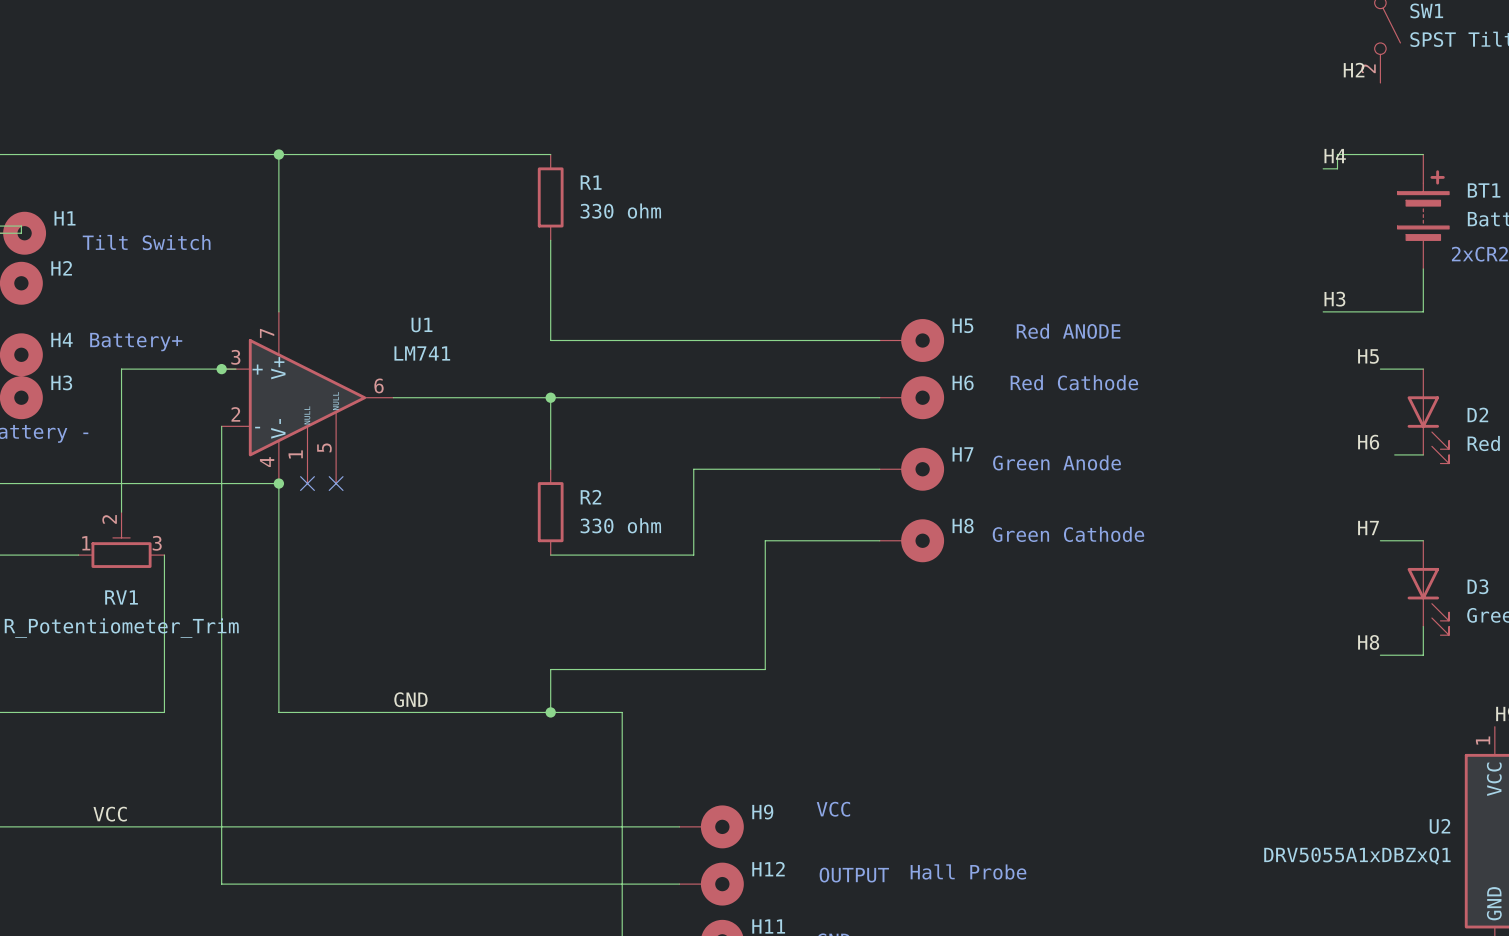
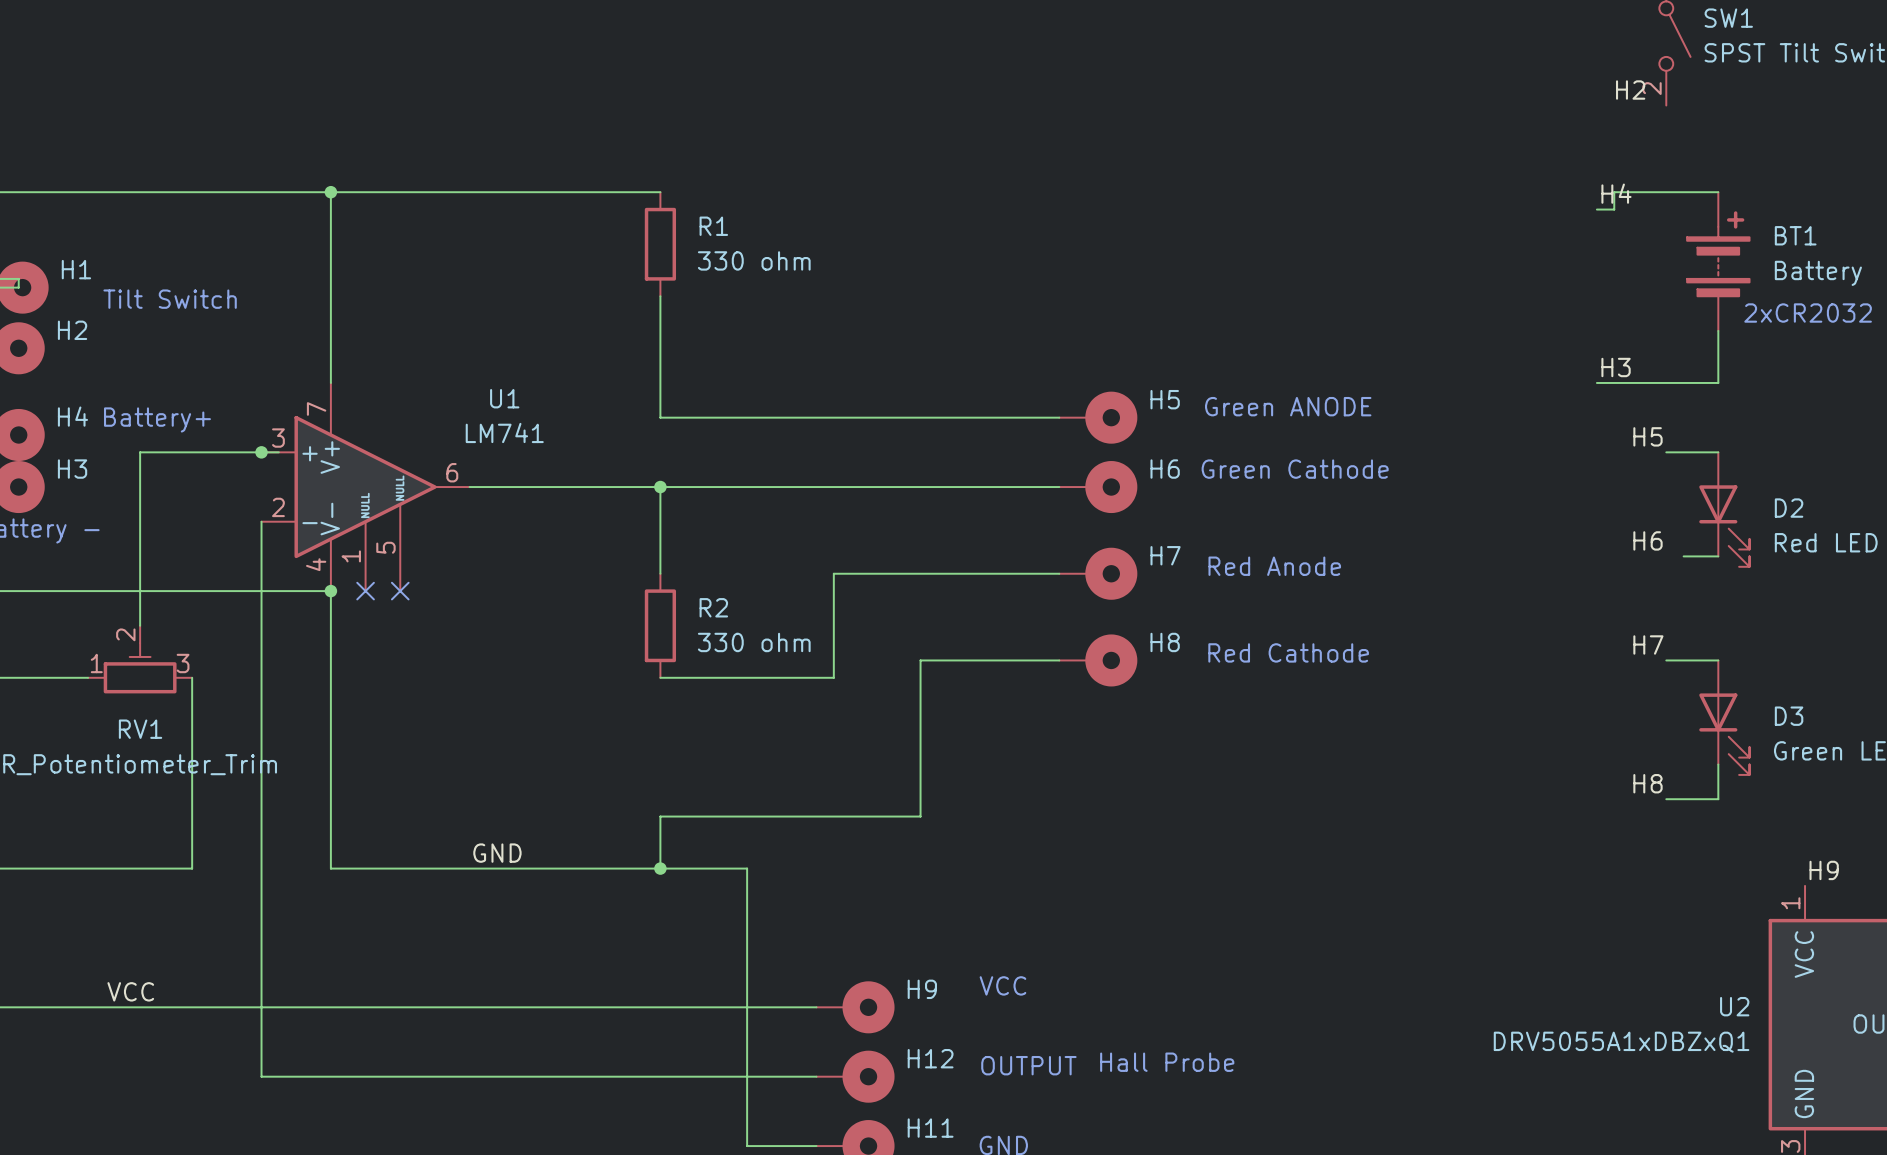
text: Red ANODE (1068, 331) -> Green ANODE (1288, 406)
text: Red Cathode (1074, 382) -> Green Cathode (1295, 469)
text: Green Anode (1057, 462) -> Red Anode (1274, 566)
text: Green Cathode (1068, 534) -> Red Cathode (1288, 652)

